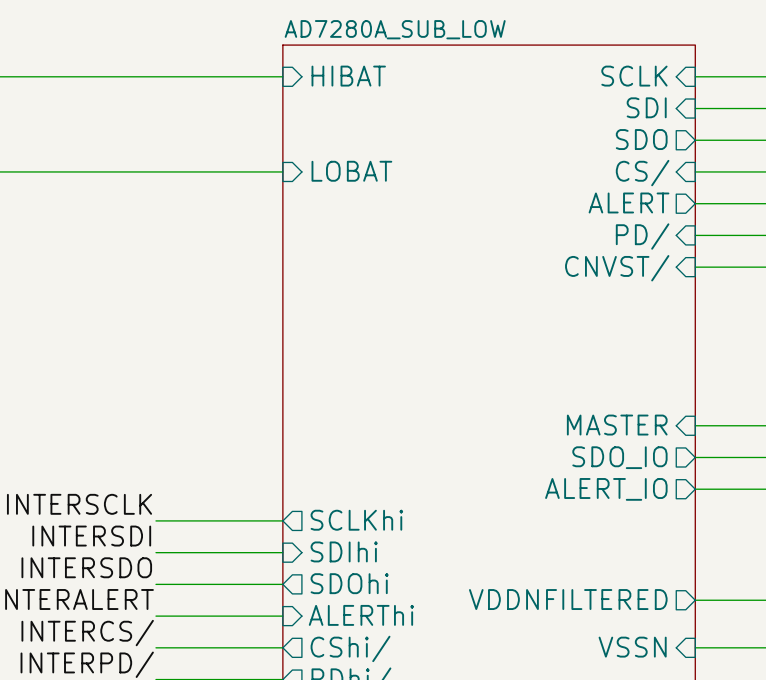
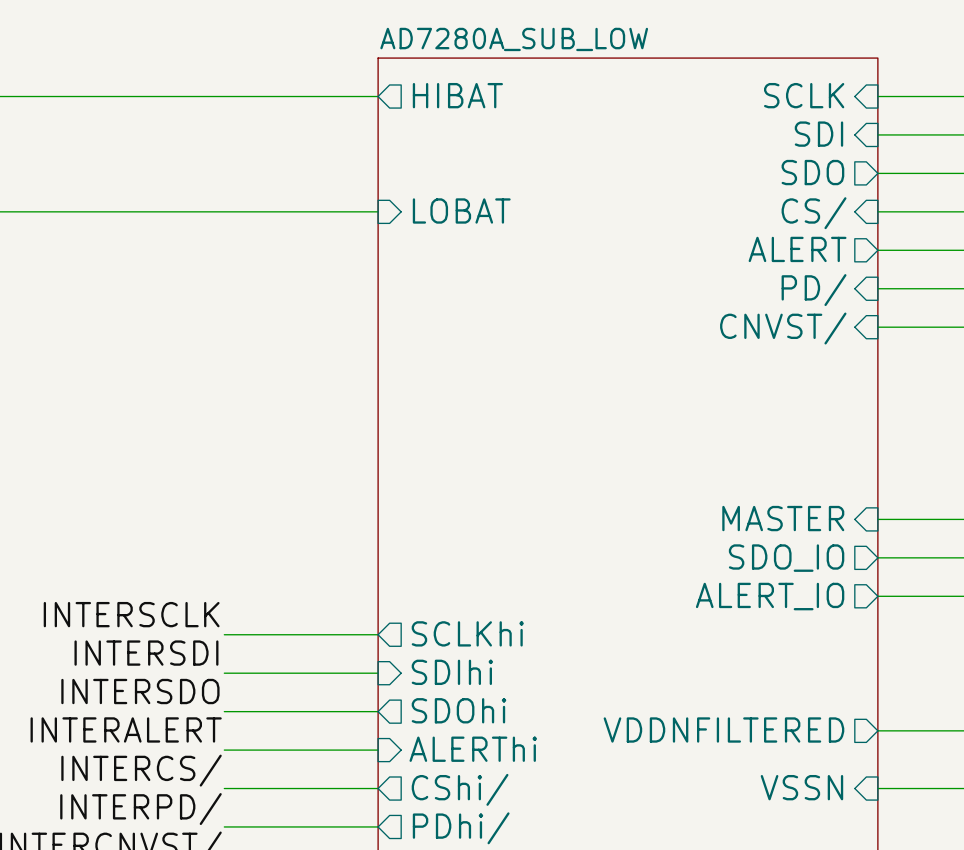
sheet pin shape: input (348, 76) -> output (457, 95)

